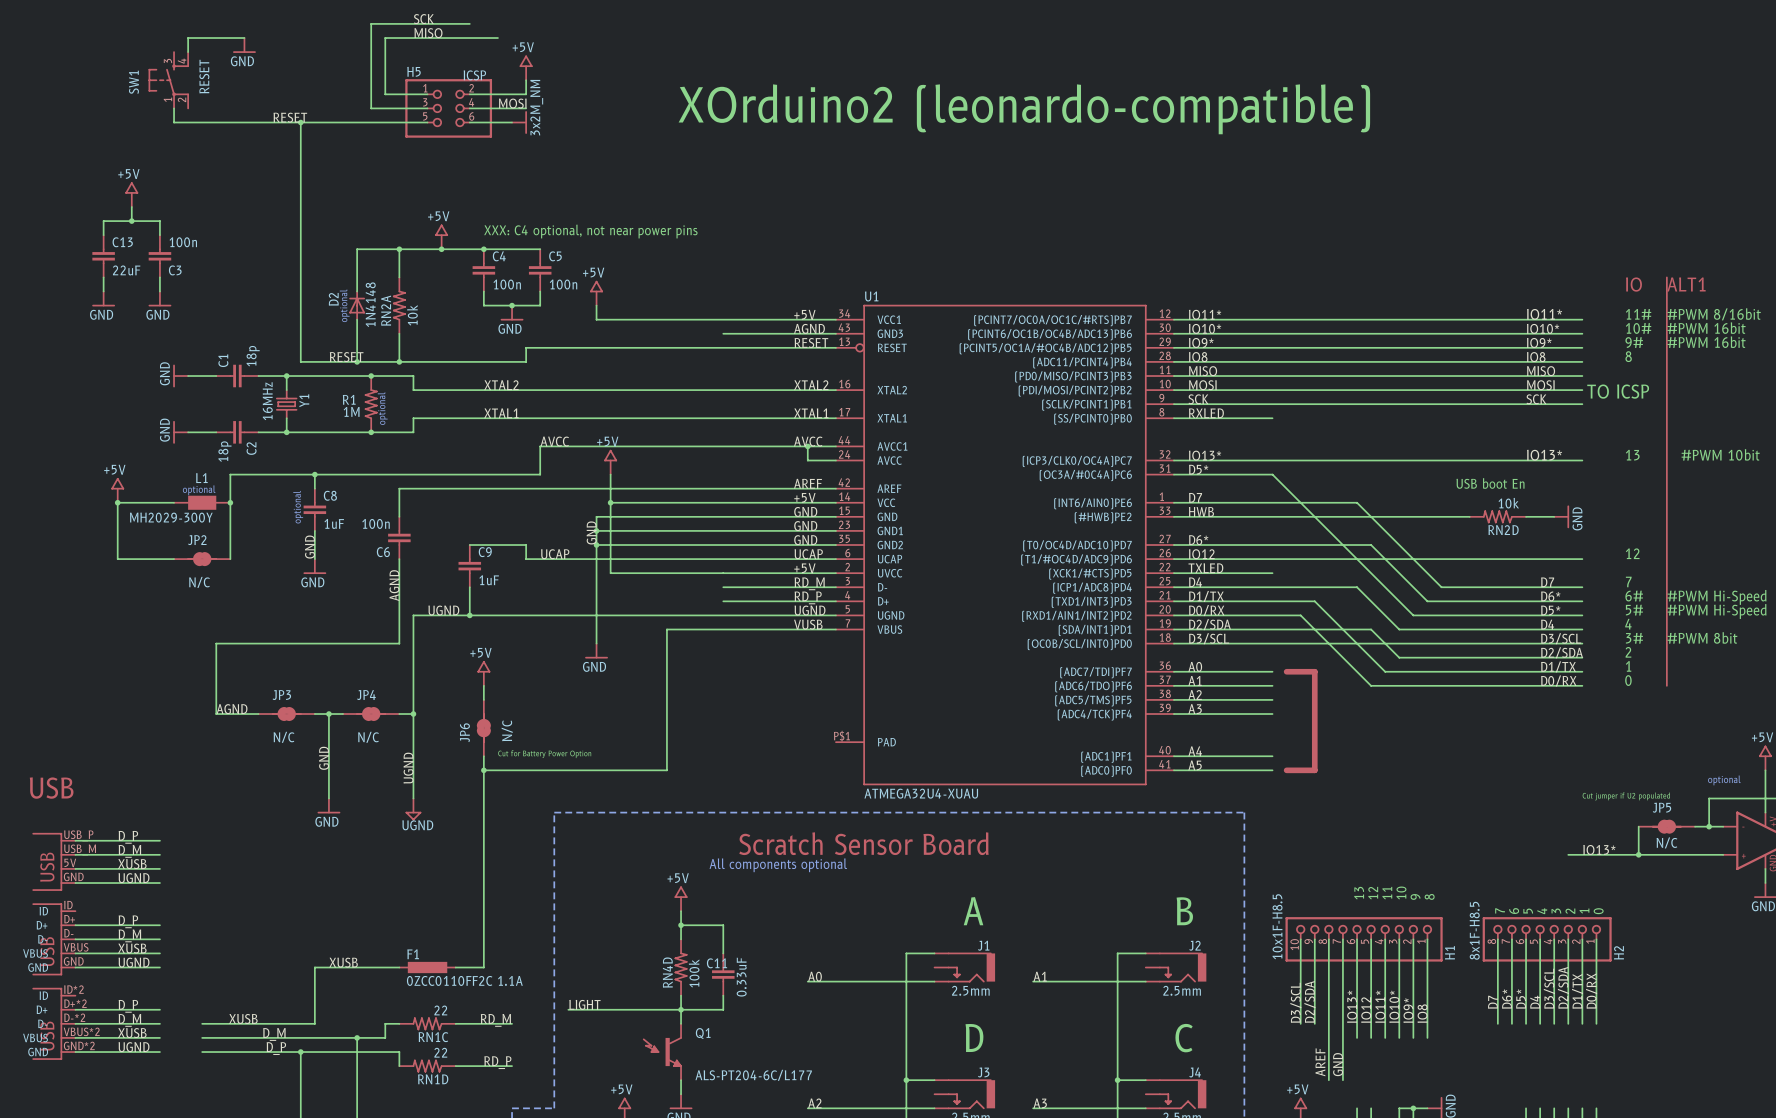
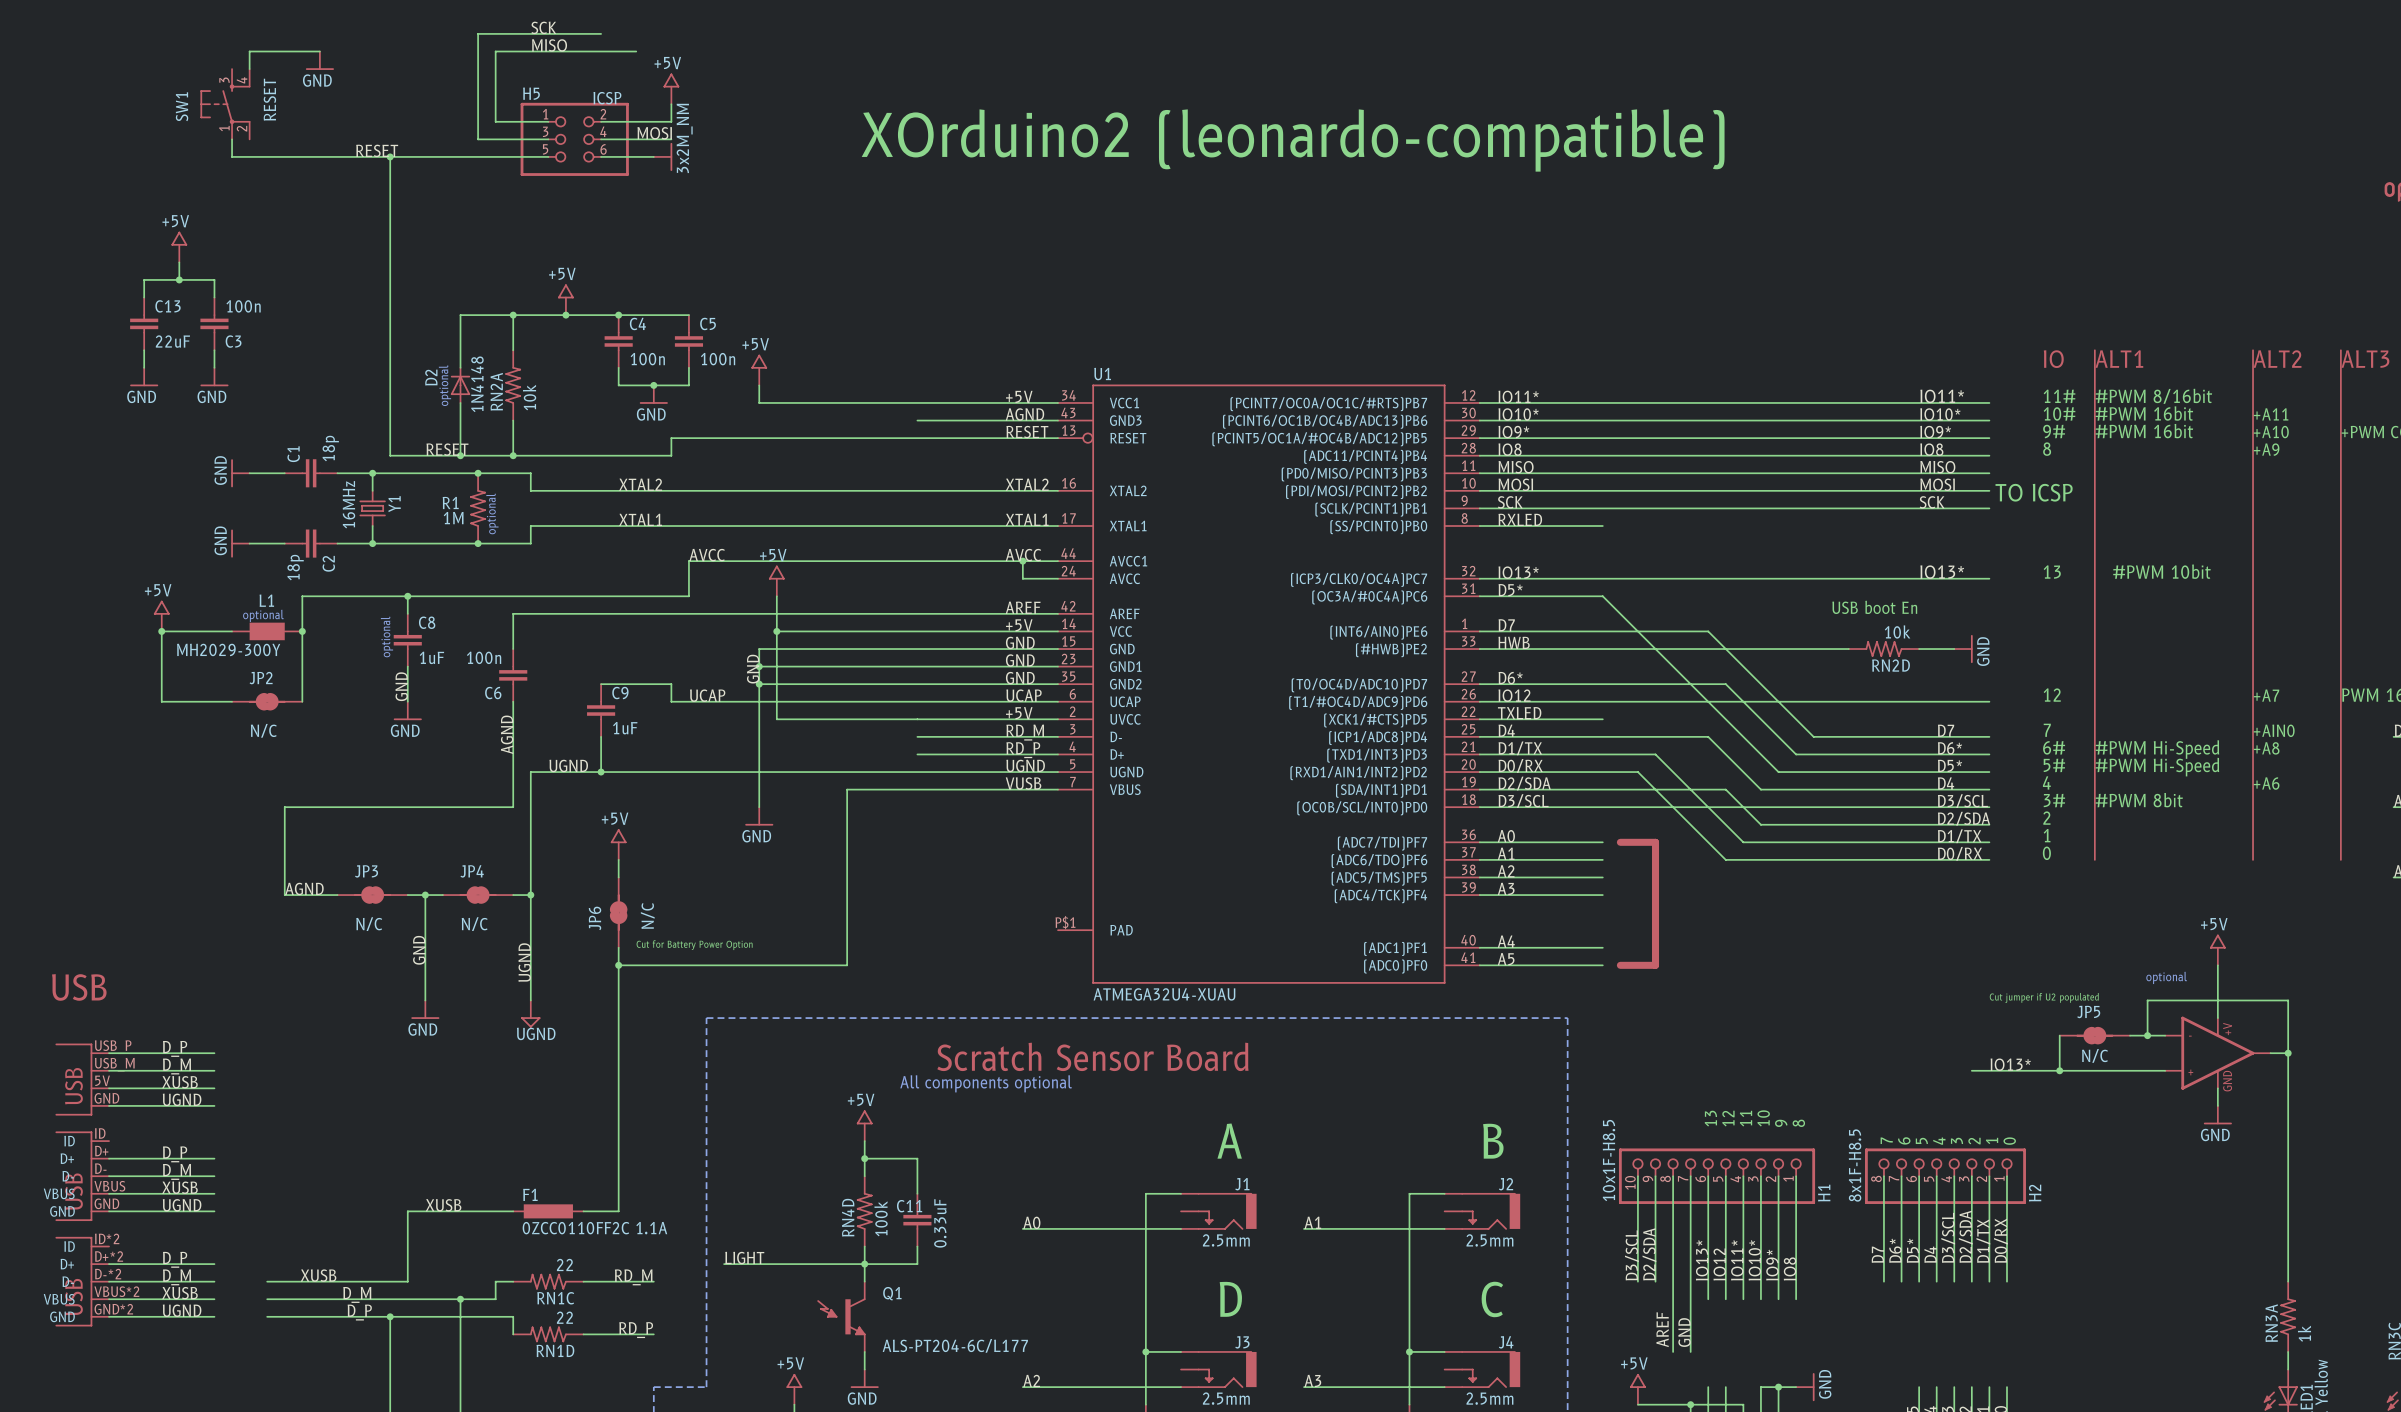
text: XXX: C4 optional, not near power pins (590, 231) -> none

